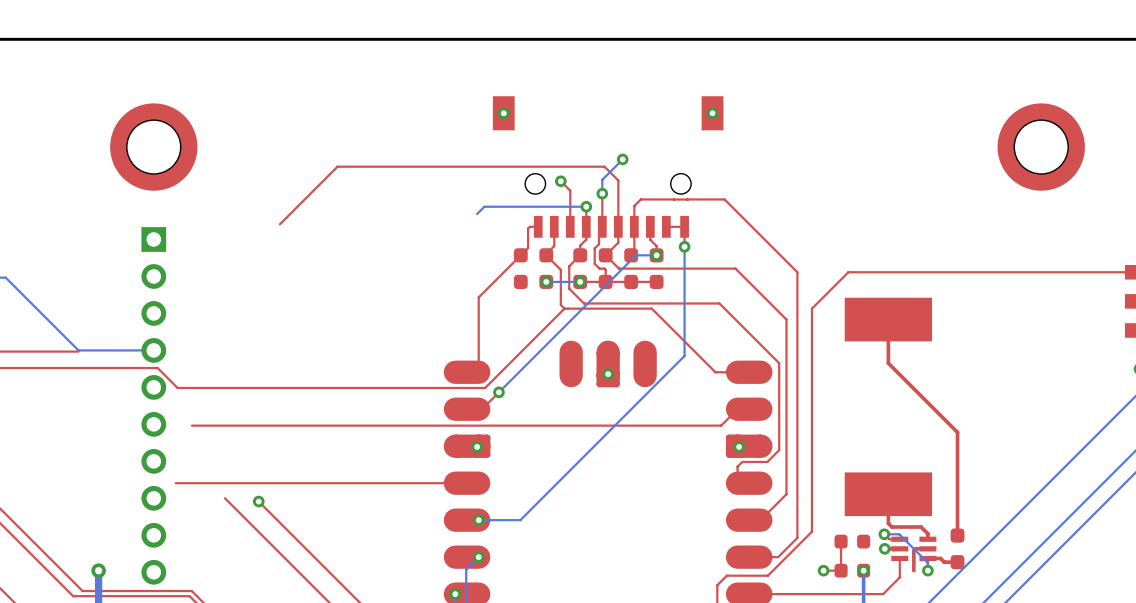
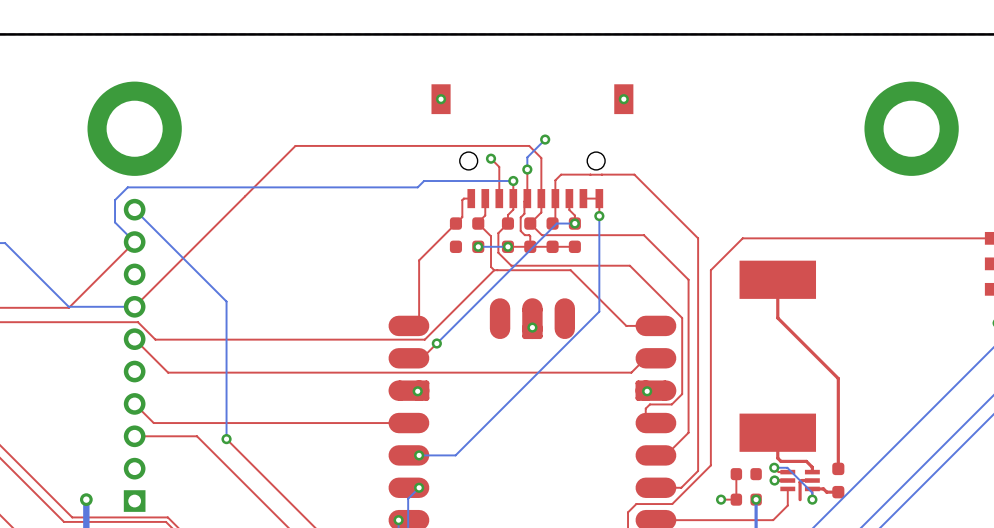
part footprint: [110, 103, 198, 191] -> [87, 81, 182, 176]
part footprint: [997, 103, 1085, 191] -> [864, 81, 959, 176]
bottom track: none -> (417, 187) (127, 187) (115, 200) (115, 222) (134, 242)
top track: none -> (245, 196) (134, 306)
bottom track: none -> (134, 209) (226, 301) (226, 439)
top track: none -> (134, 242) (68, 307)
top track: none -> (134, 339) (168, 372)
part rotation: 0° (153, 405) -> 180° (134, 355)
top track: none -> (134, 403) (153, 423)
top track: none -> (197, 436) (134, 436)

